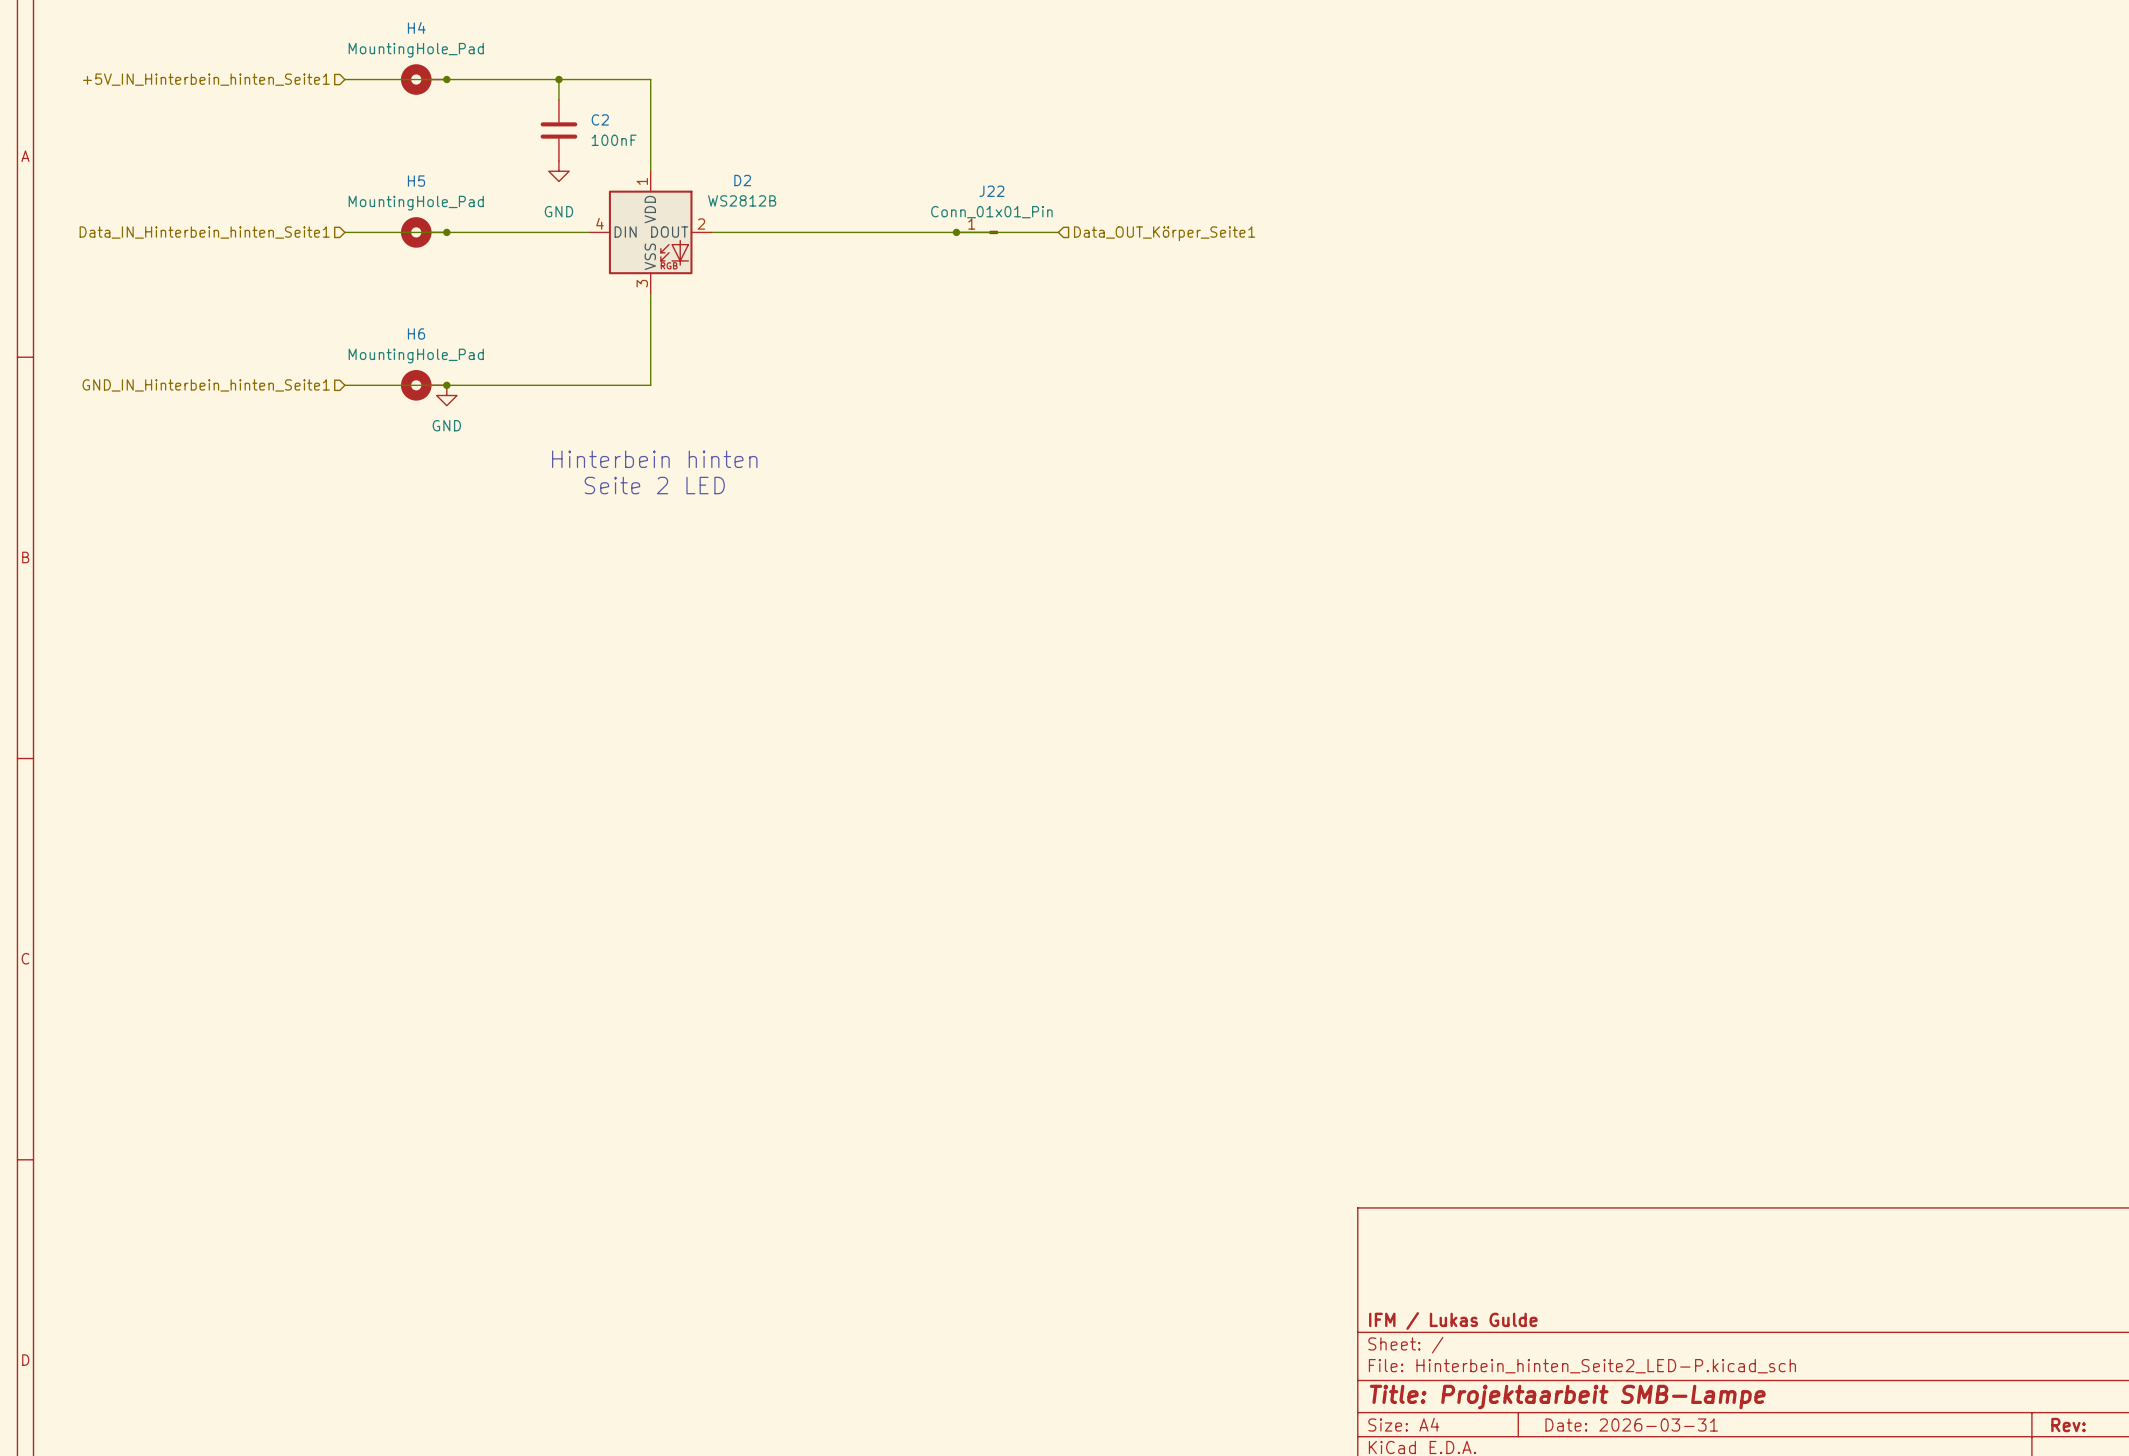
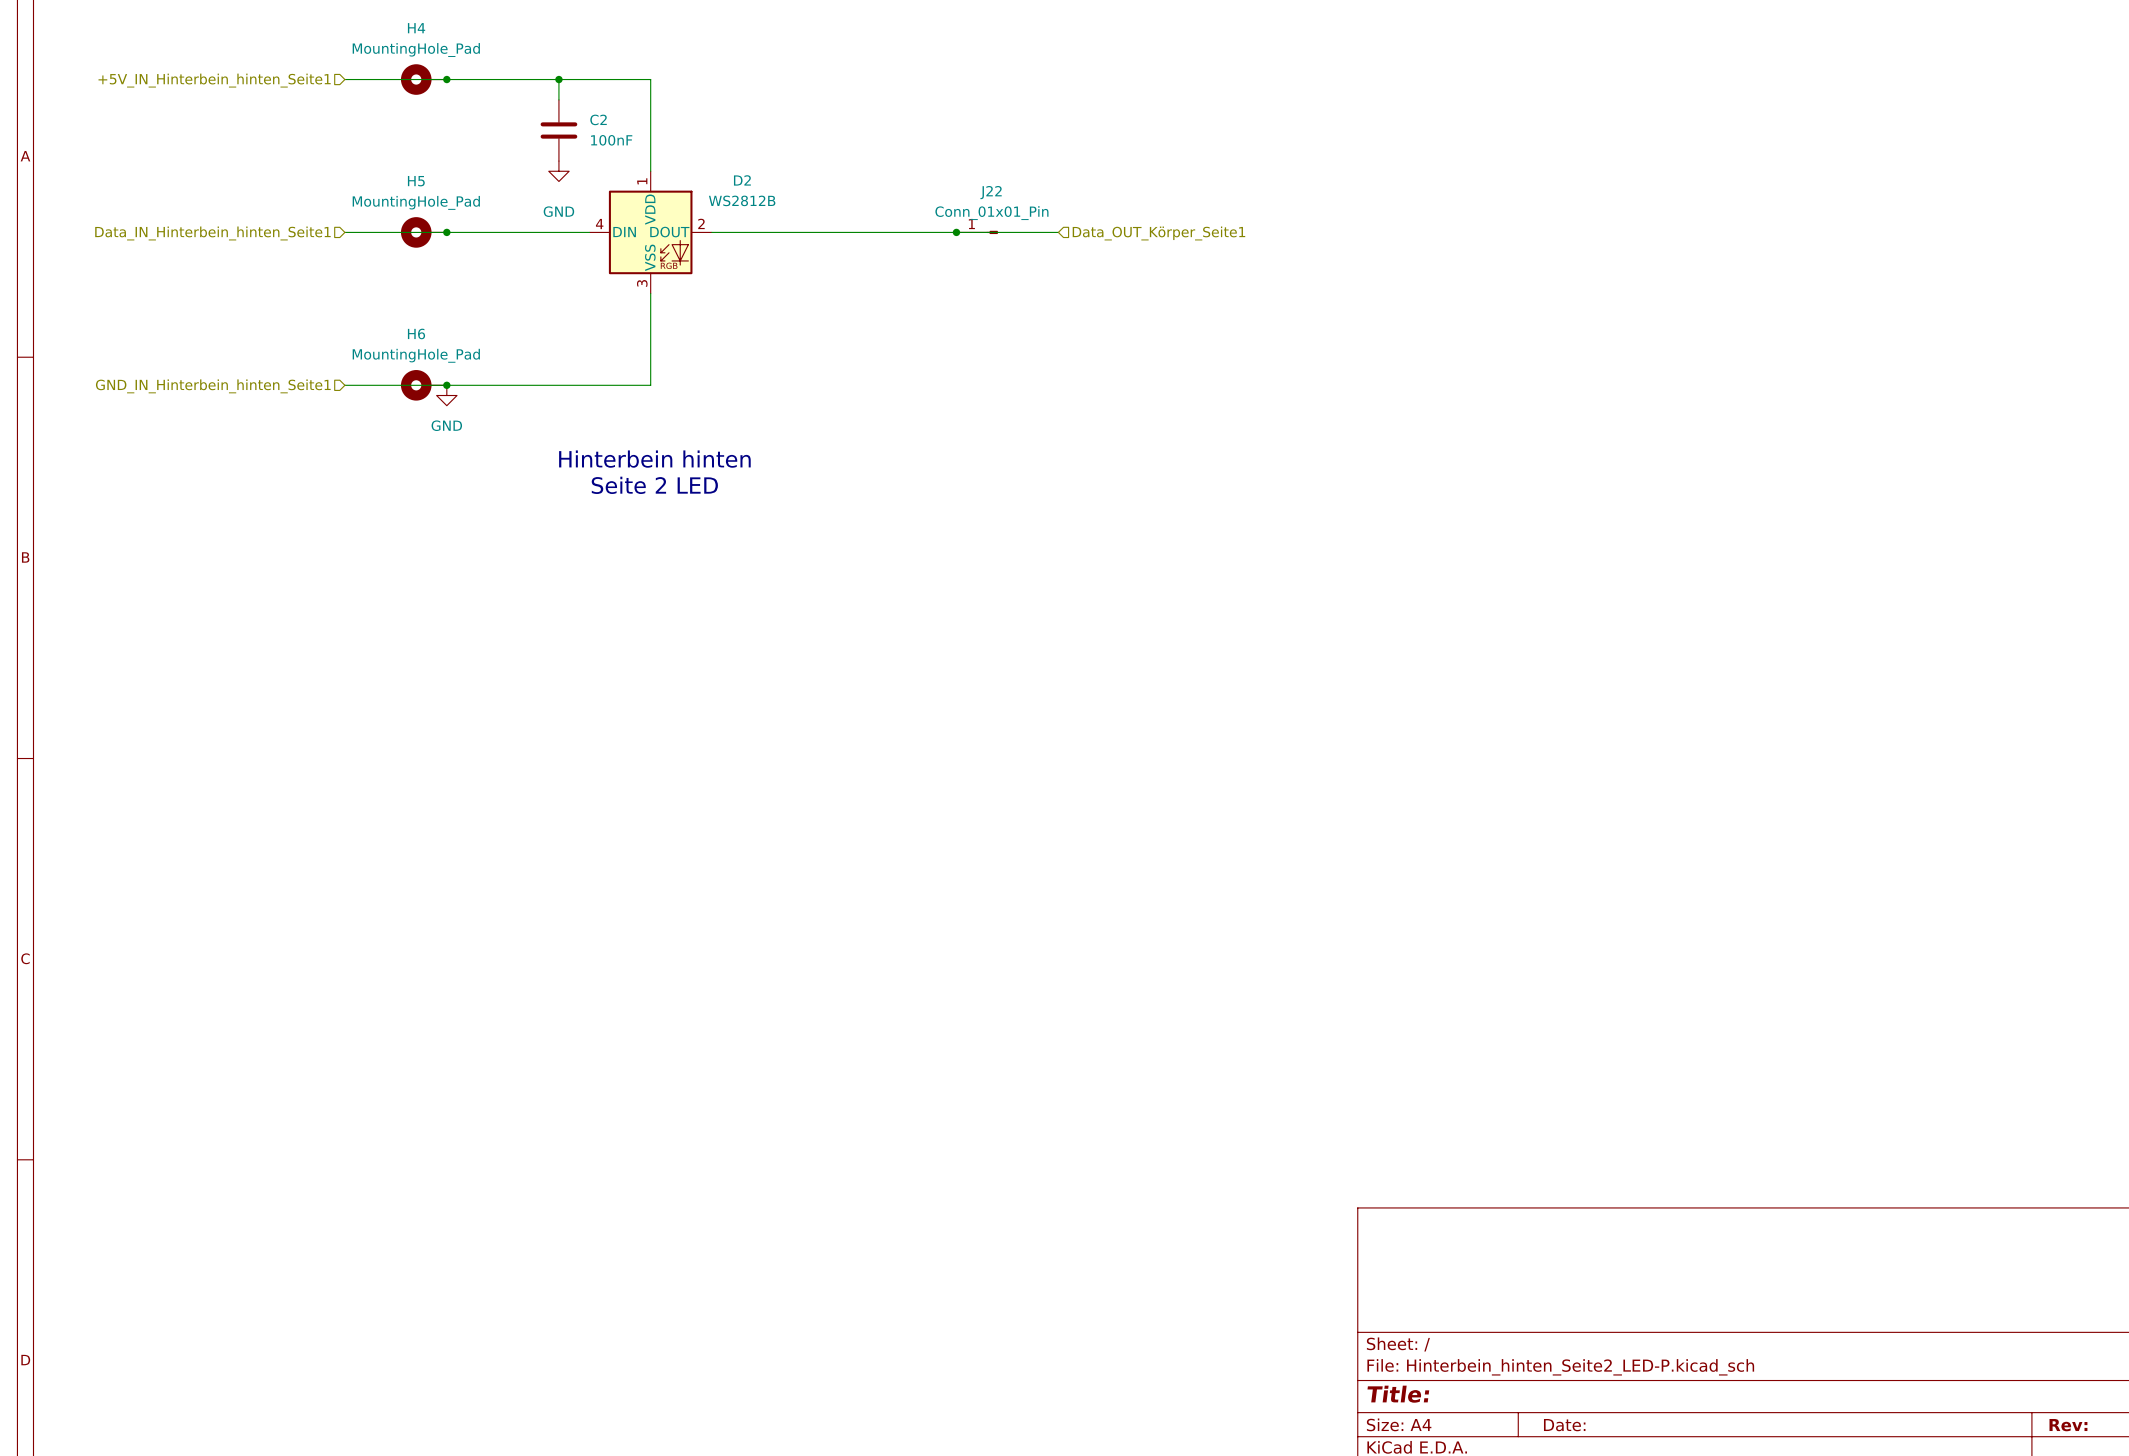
title block: IFM / Lukas Gulde (1453, 1321) -> none
title block: Title: Projektaarbeit SMB-Lampe (1567, 1397) -> Title: (1398, 1394)
title block: Date: 2026-03-31 (1631, 1425) -> Date: (1564, 1425)

